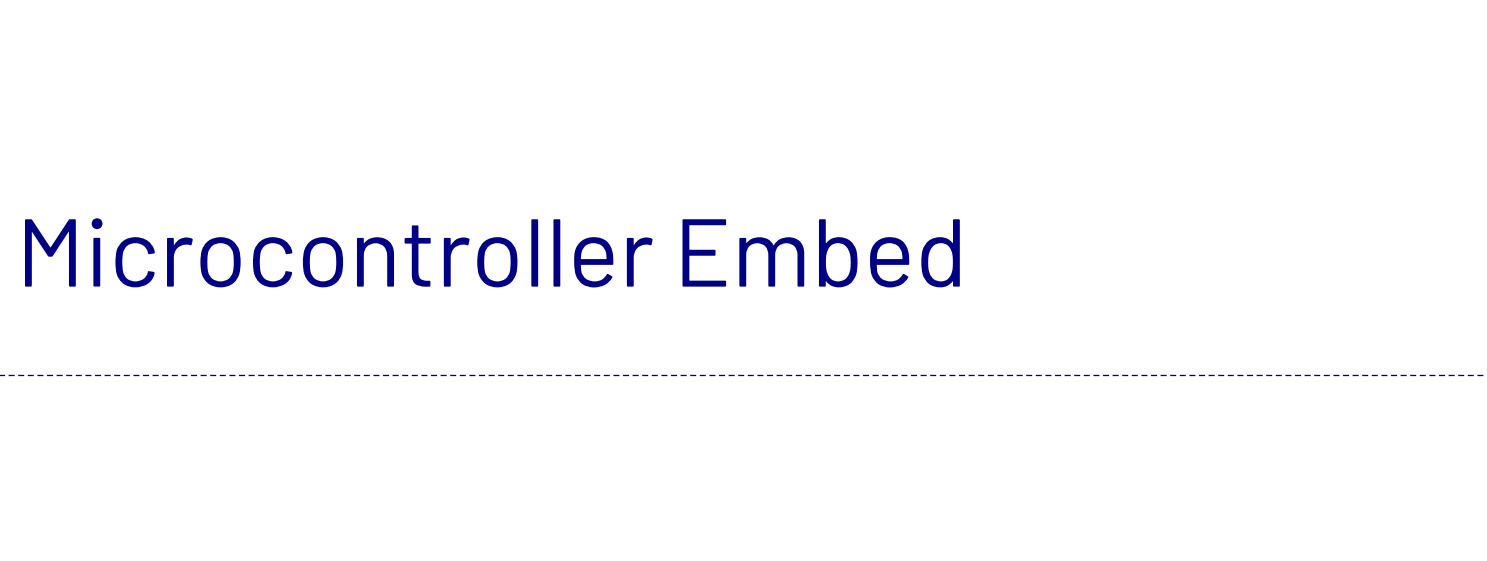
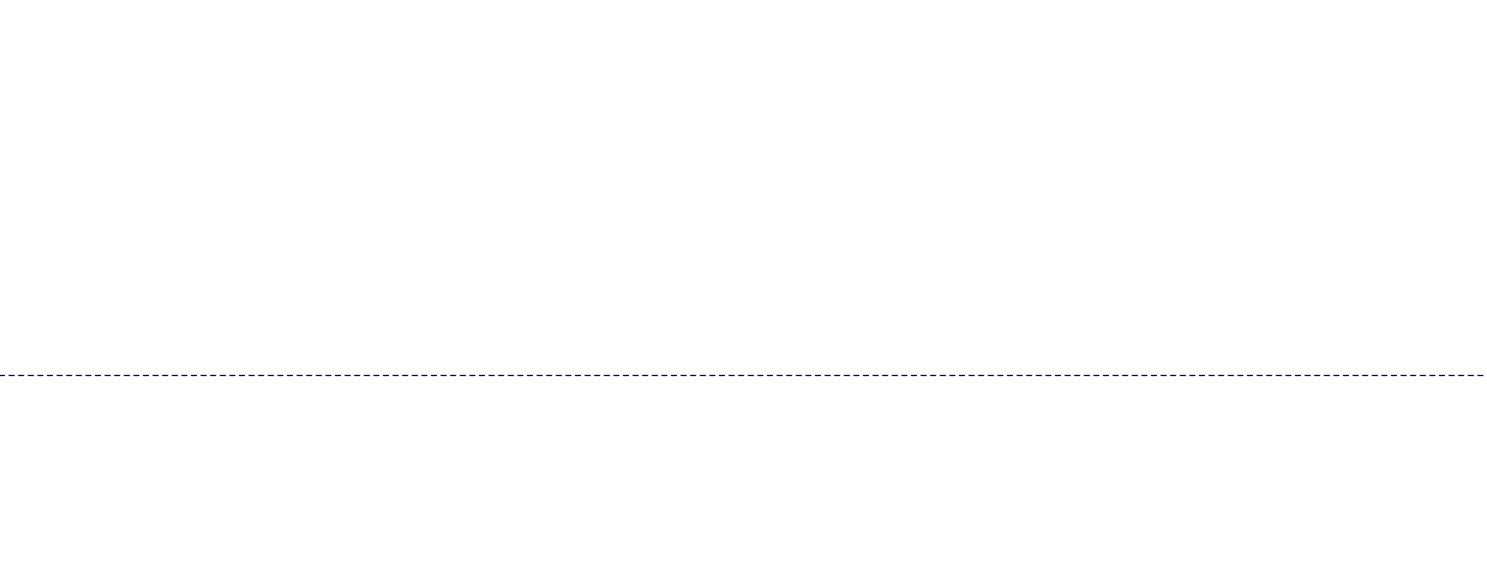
text: Microcontroller Embed (492, 252) -> none

